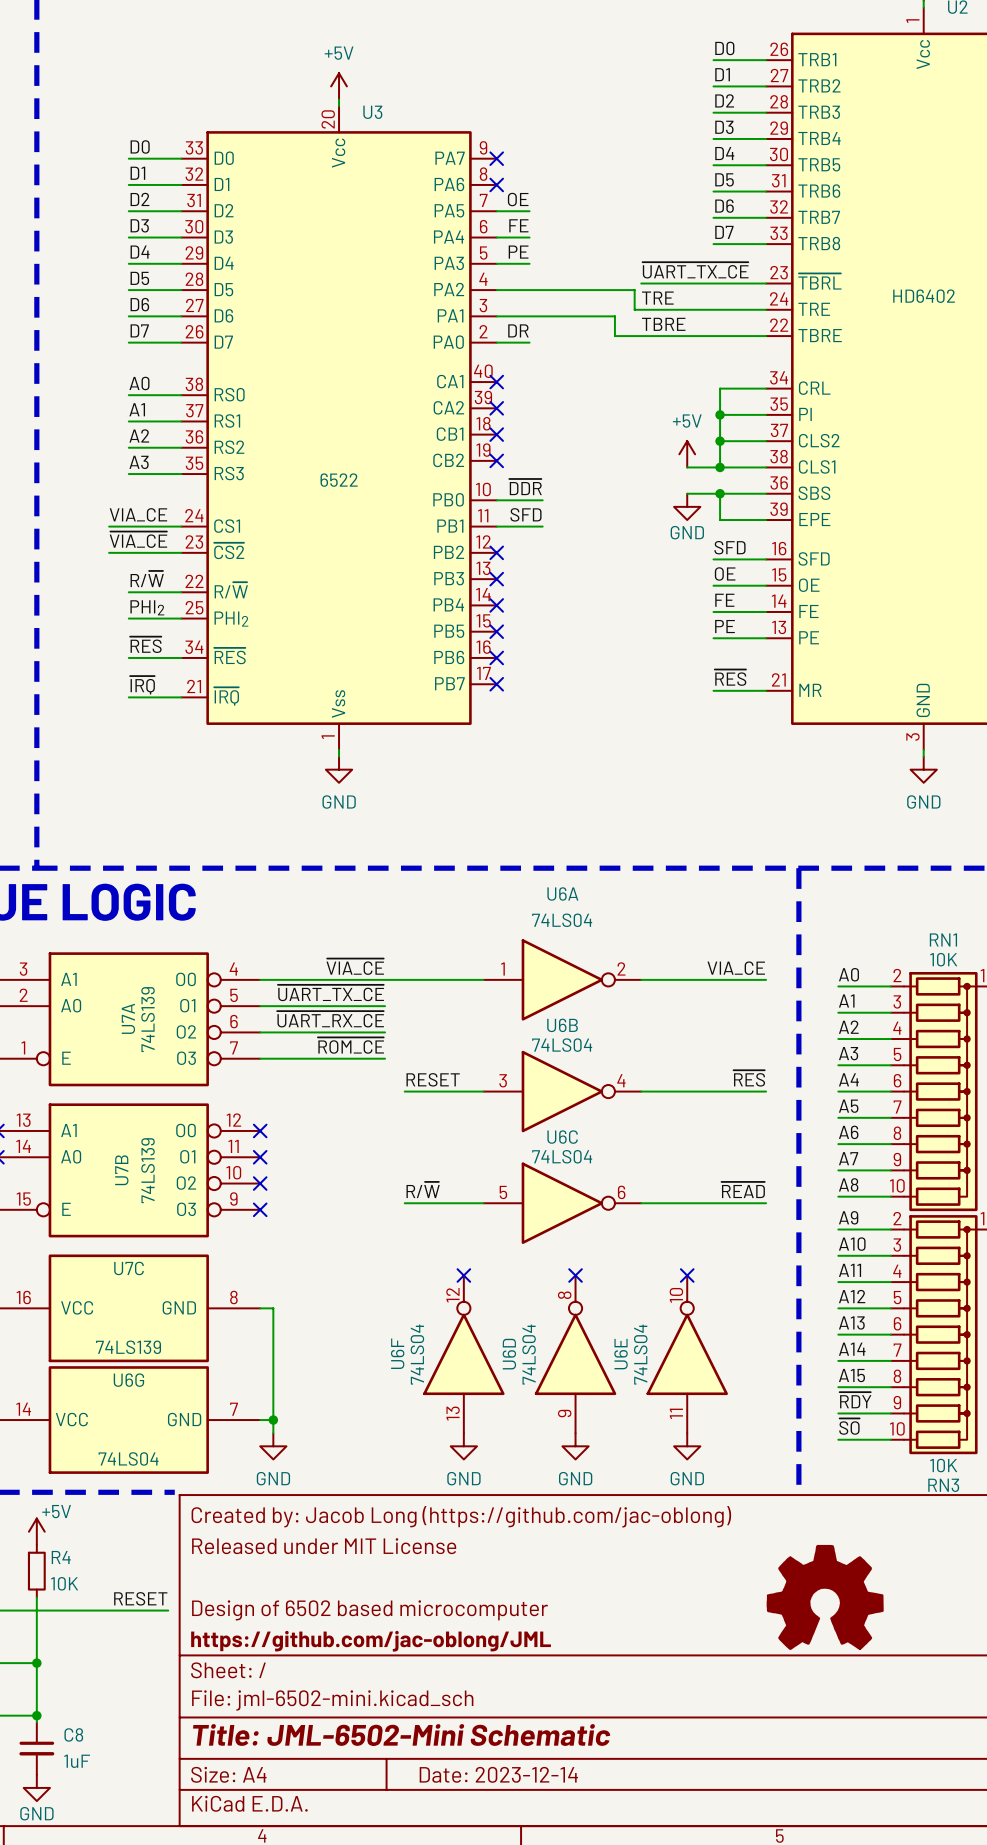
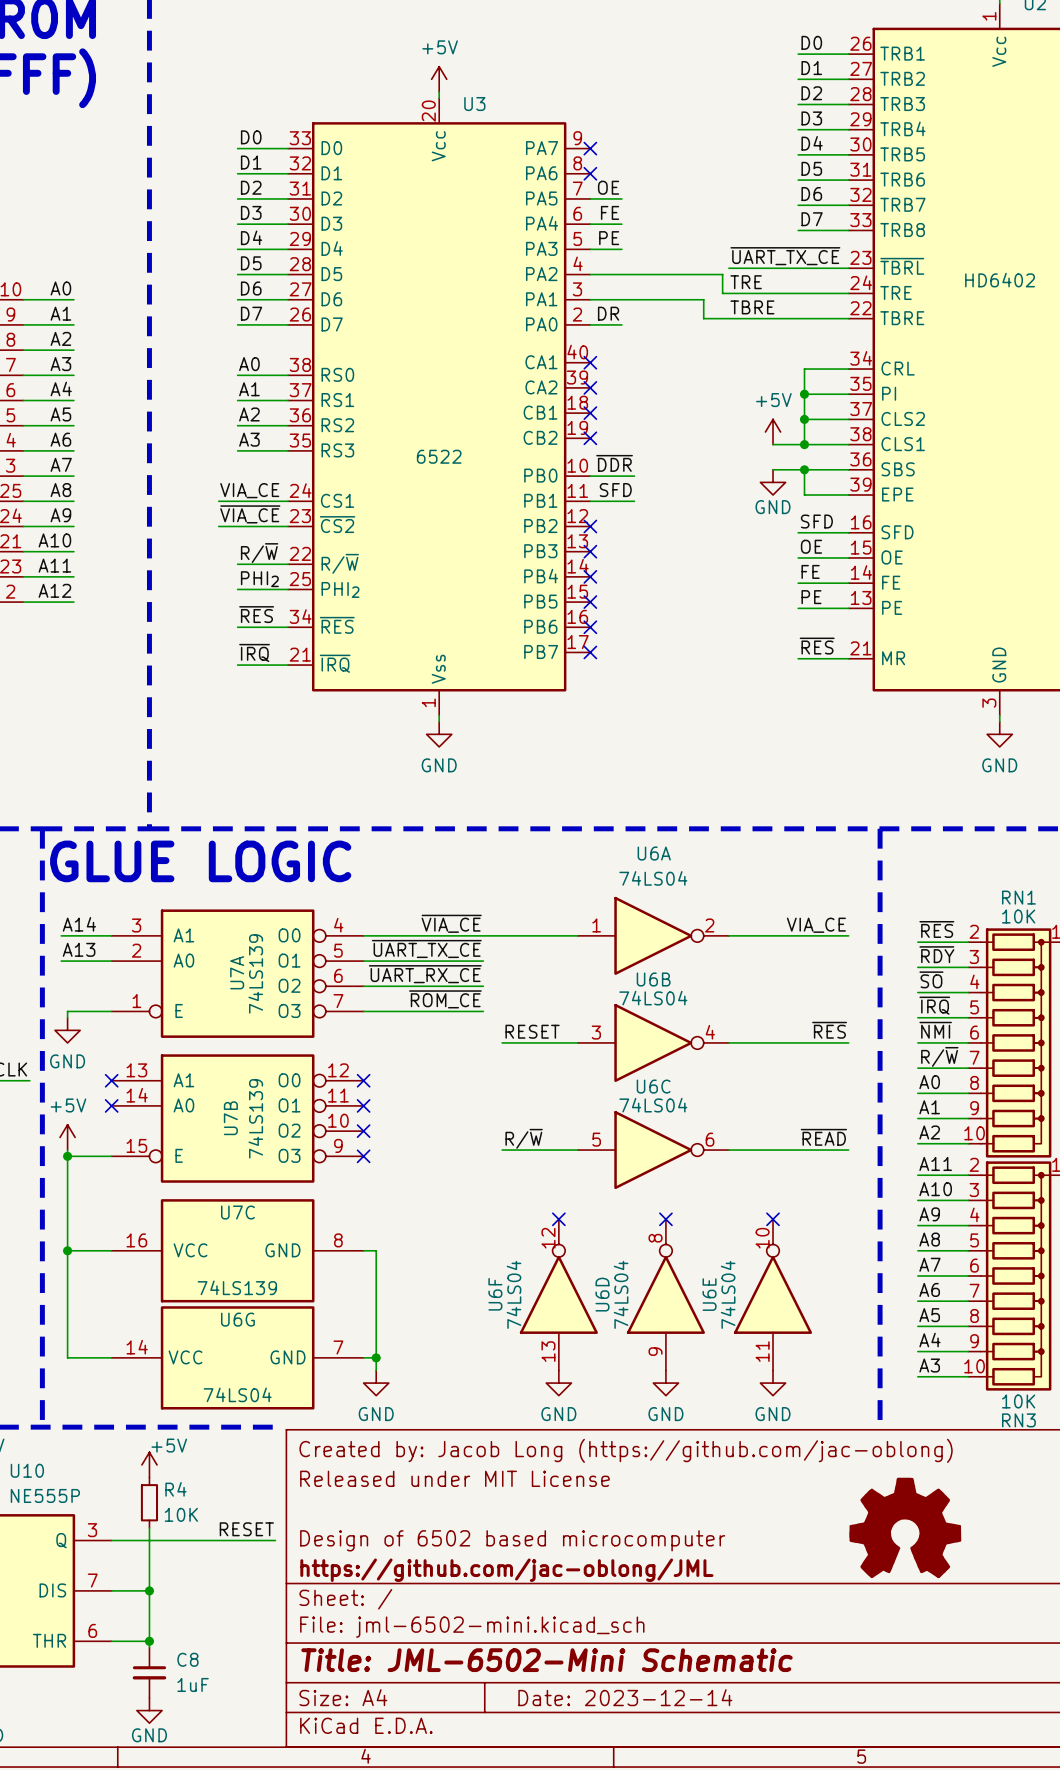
label: A0 (848, 974) -> ~{RES} (936, 929)
label: A1 (846, 1001) -> ~{RDY} (936, 954)
label: A2 (848, 1027) -> ~{SO} (931, 979)
label: A3 (848, 1053) -> ~{IRQ} (934, 1005)
label: A4 (848, 1079) -> ~{NMI} (935, 1030)
label: A5 (848, 1106) -> R/~{W} (939, 1056)
label: A6 (848, 1132) -> A0 (929, 1082)
label: A7 (848, 1158) -> A1 (929, 1107)
label: A8 (848, 1184) -> A2 (929, 1132)
label: A9 (848, 1217) -> A11 (935, 1163)
label: A11 (850, 1270) -> A9 (929, 1214)
label: A12 (852, 1296) -> A8 (929, 1239)
label: A13 (851, 1322) -> A7 (929, 1264)
label: A14 (852, 1349) -> A6 (929, 1289)
label: A15 (851, 1375) -> A5 (929, 1315)
label: ~{RDY} (855, 1400) -> A4 (929, 1340)
label: ~{SO} (849, 1426) -> A3 (929, 1365)

